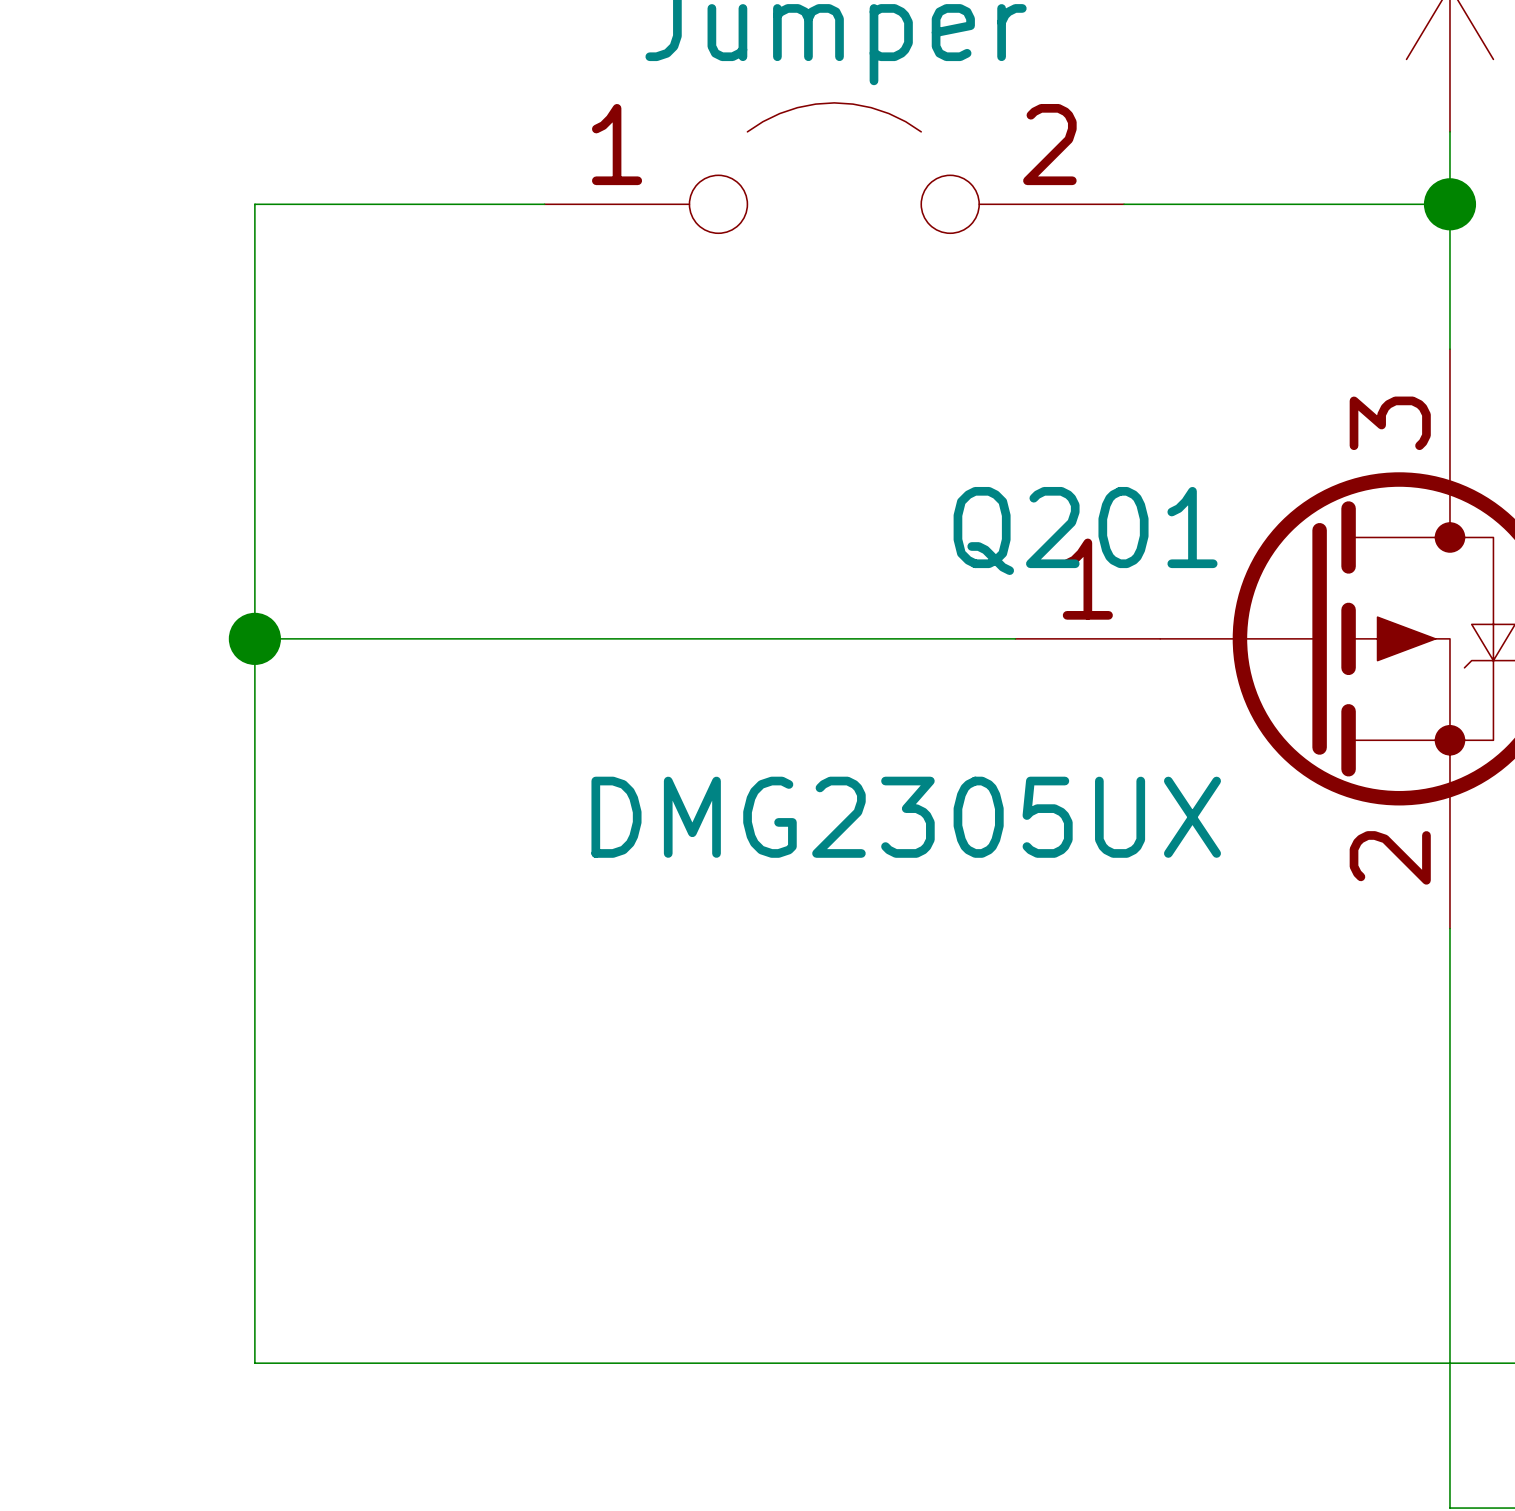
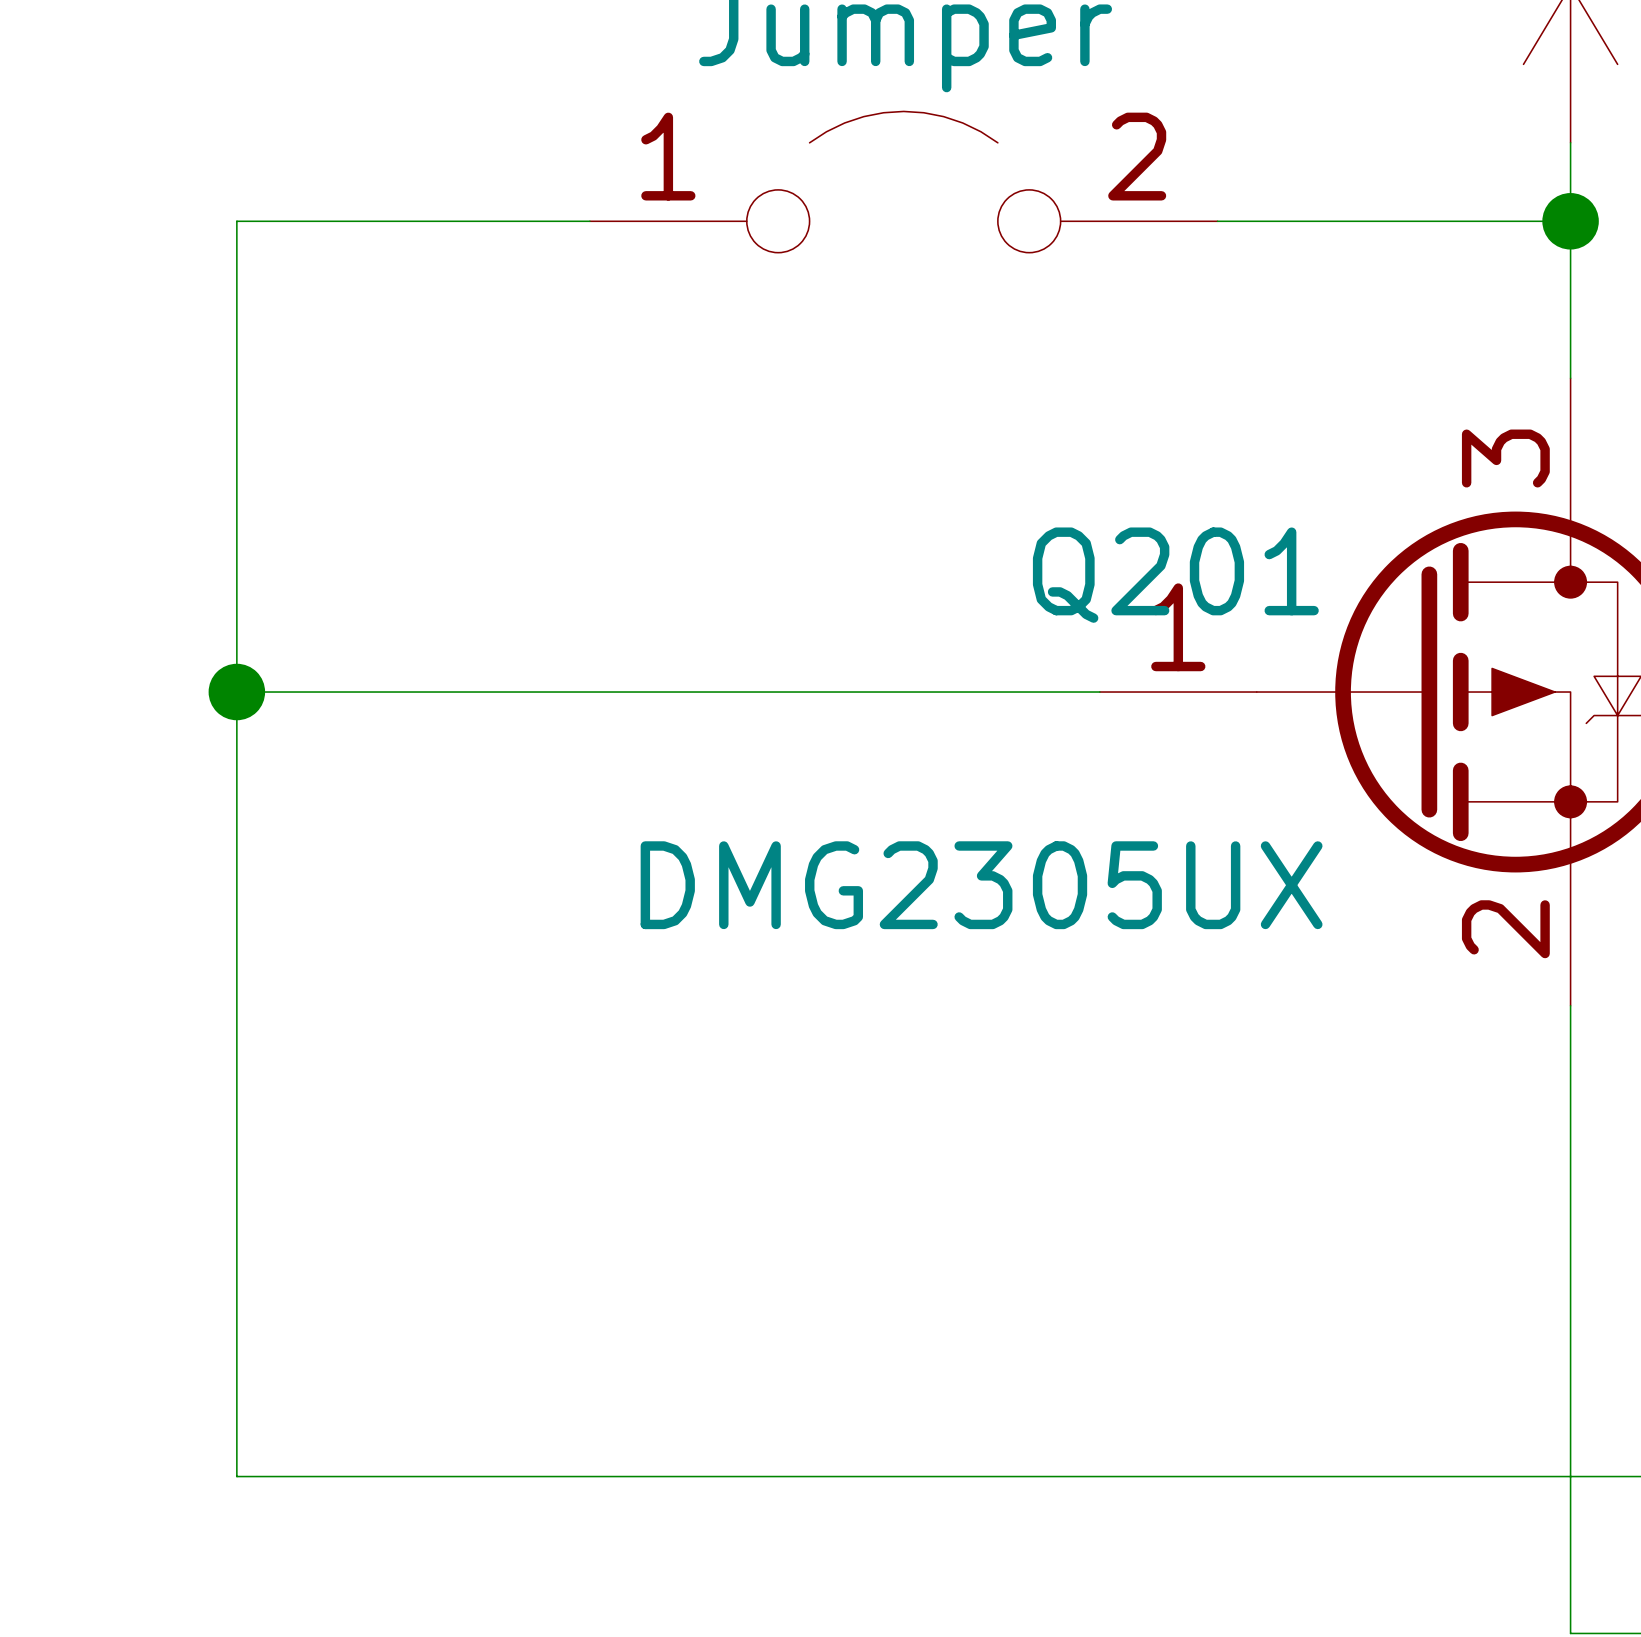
wire: (254, 204) (254, 1363) -> (276, 221) (236, 221) (236, 1476) (276, 1476)
junction position: (254, 638) -> (236, 692)

